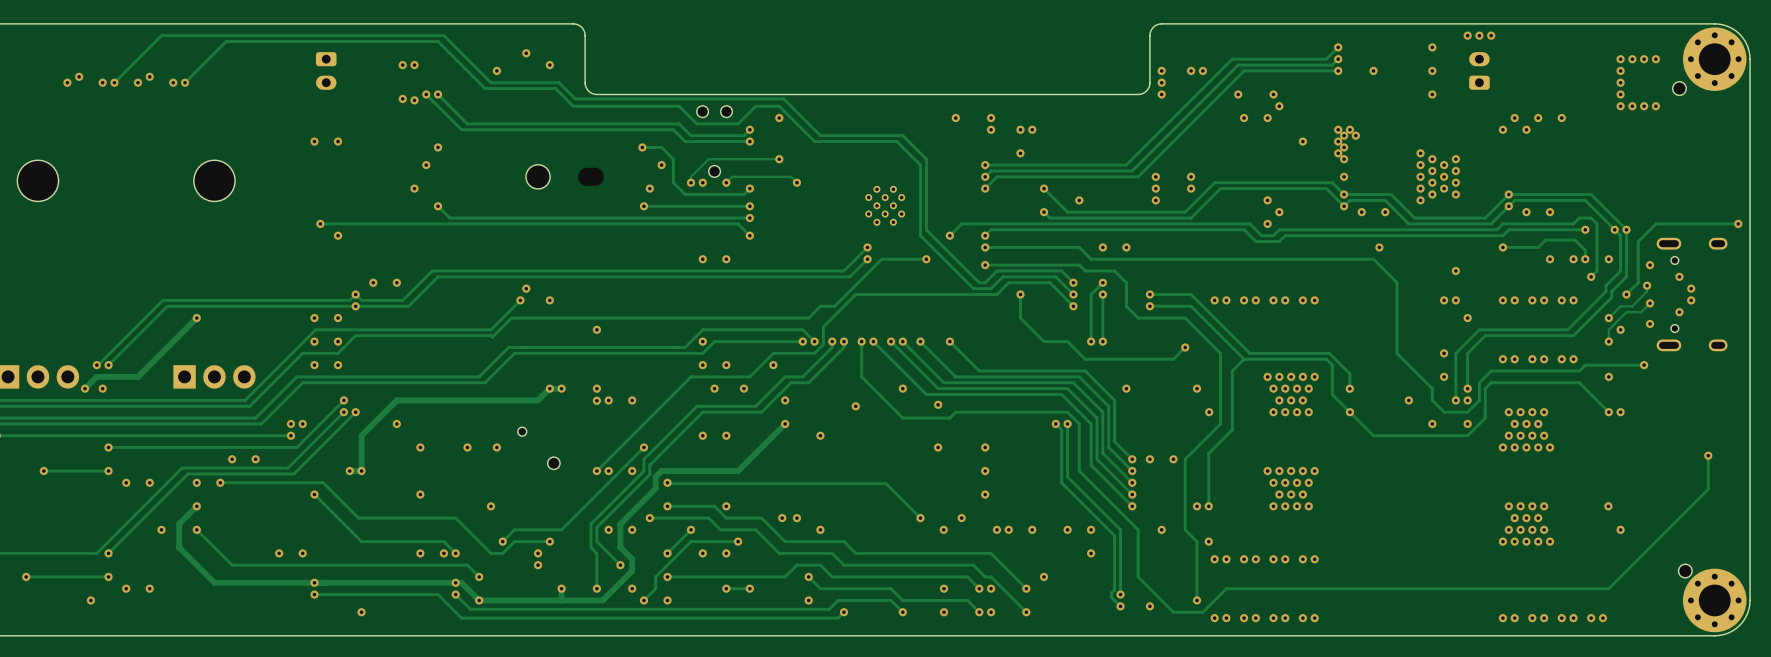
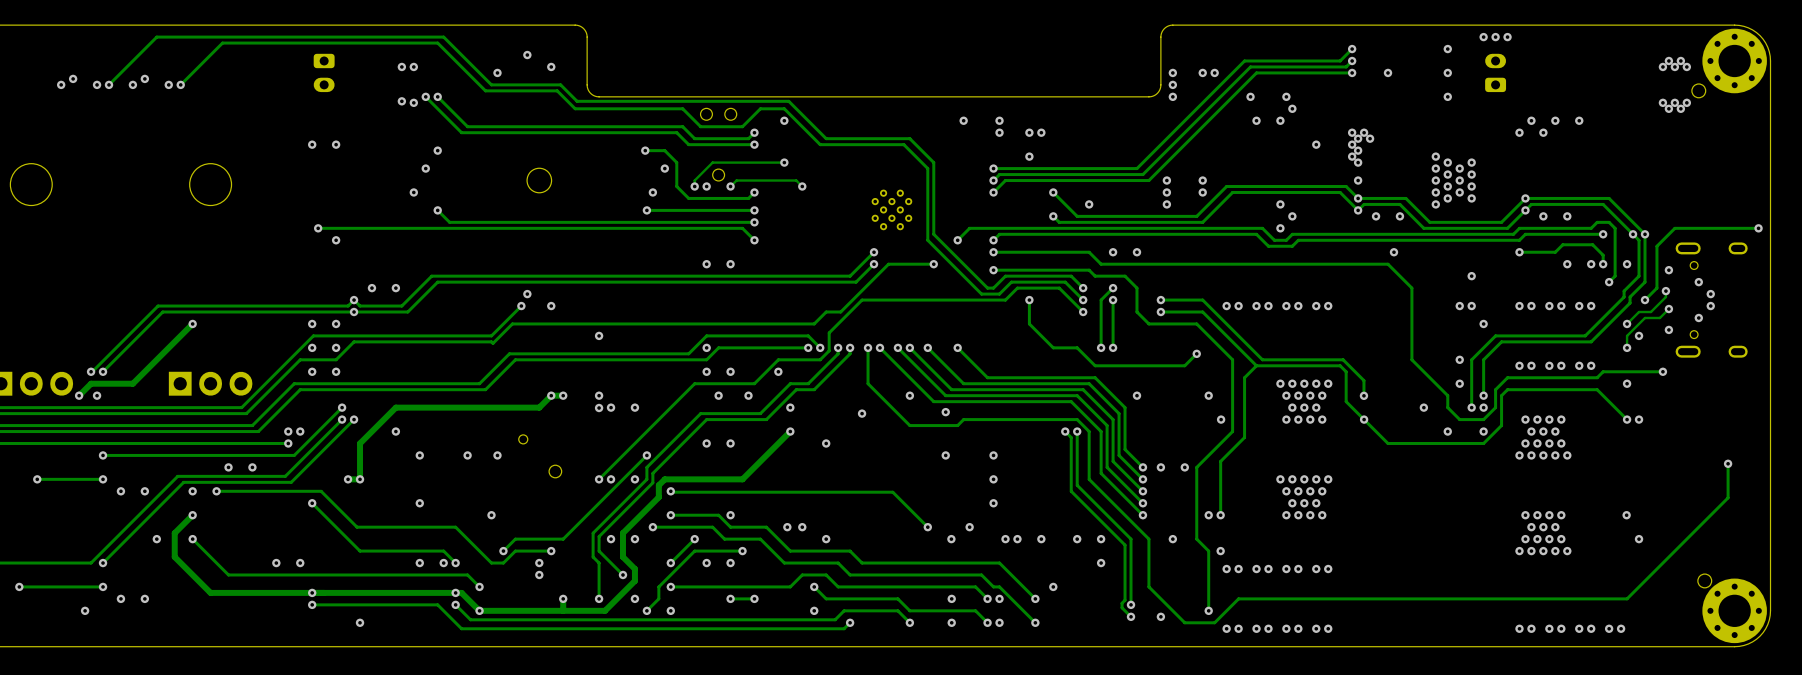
via: (1620, 59) -> none
via: (1632, 59) -> none
via: (1644, 59) -> none
via: none -> (1668, 60)
via: (1655, 59) -> none
via: none -> (1680, 60)
via: none -> (1662, 66)
via: none -> (1674, 66)
via: none -> (1686, 66)
via: (1620, 70) -> none
via: (1620, 82) -> none
via: (1620, 94) -> none
via: none -> (1662, 102)
via: none -> (1674, 102)
via: none -> (1686, 102)
via: (1620, 106) -> none
via: (1632, 106) -> none
via: (1644, 106) -> none
via: none -> (1668, 108)
via: (1655, 106) -> none
via: none -> (1680, 108)

